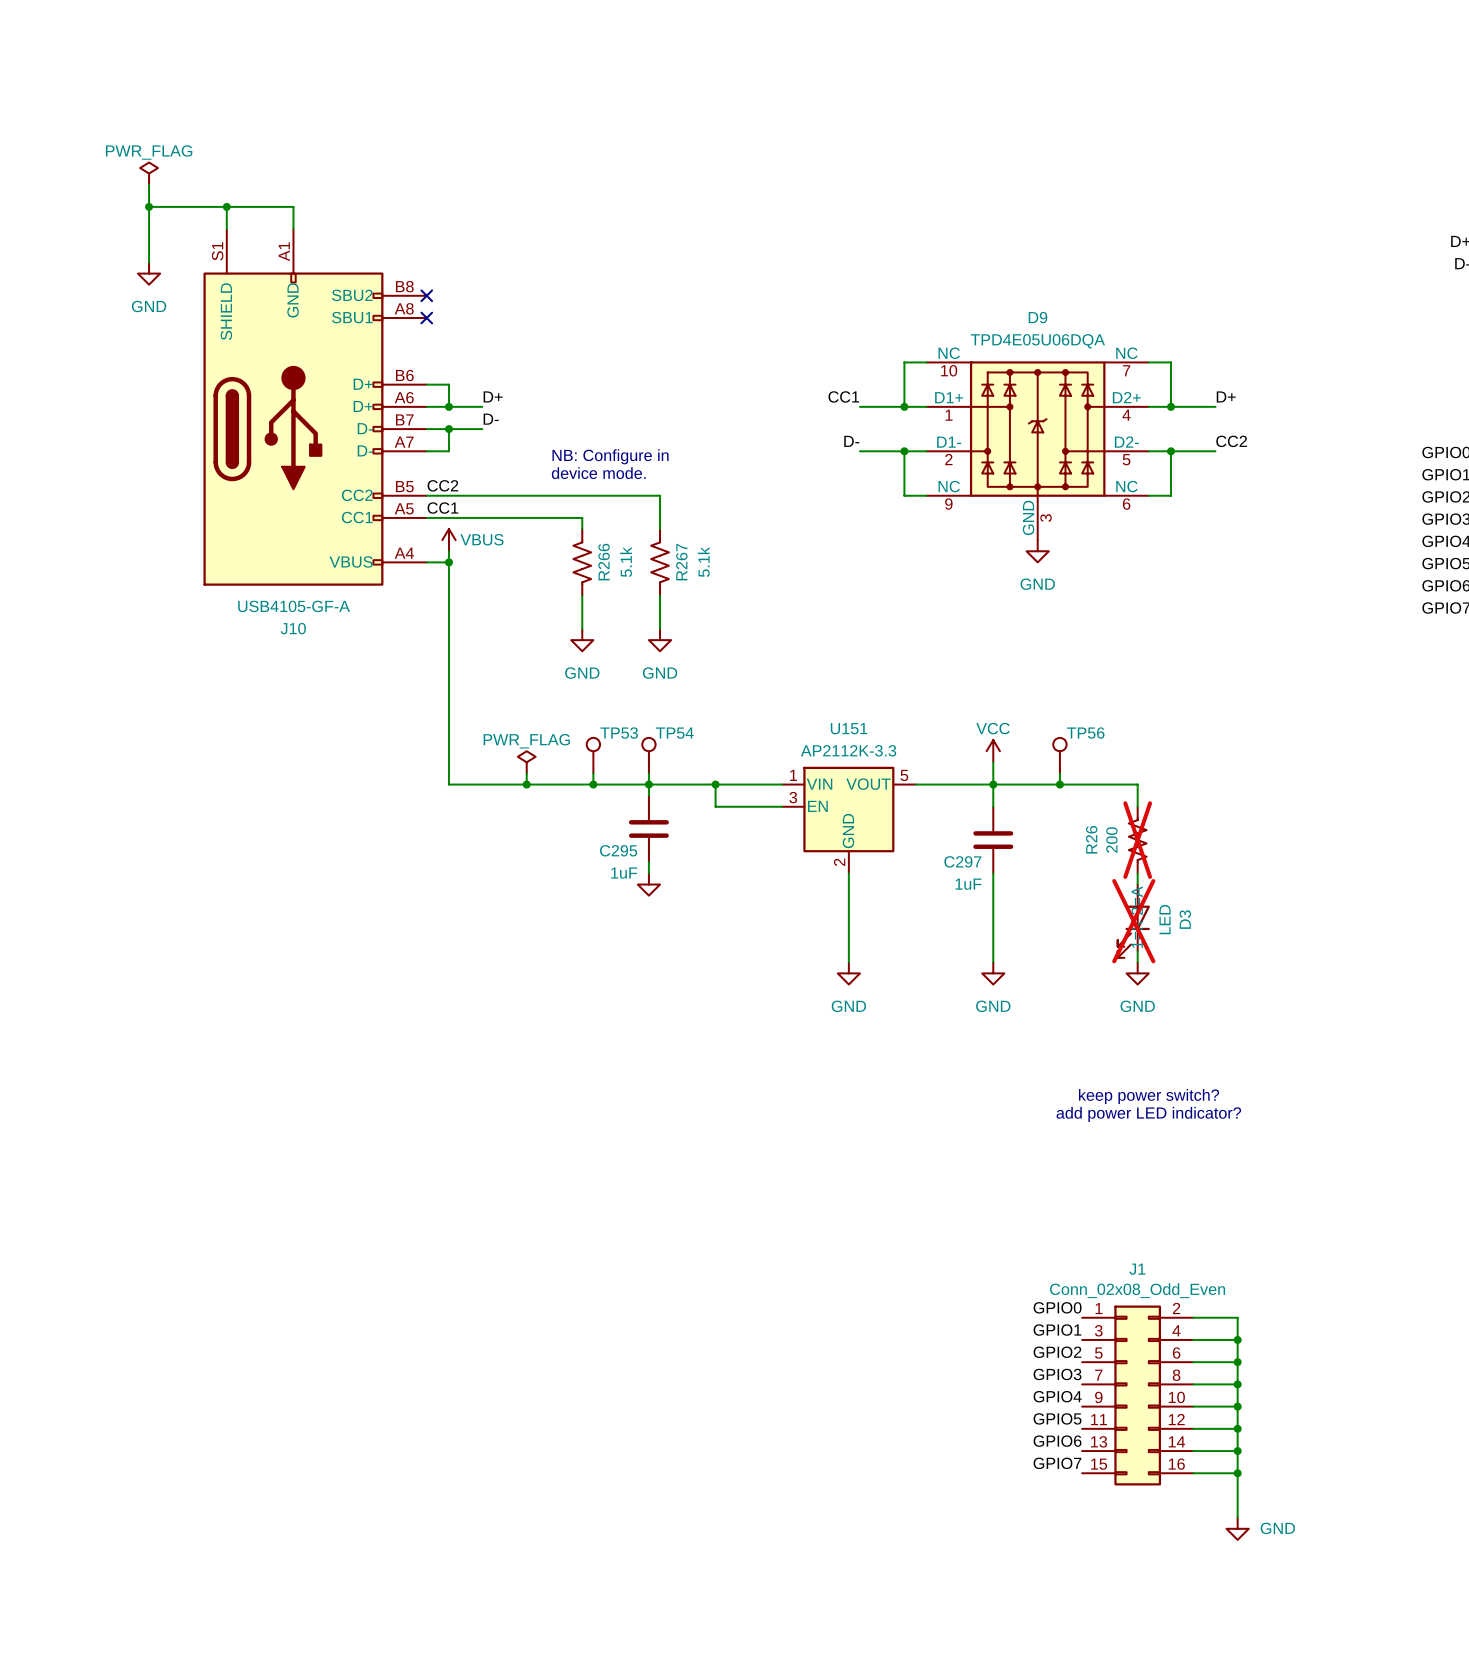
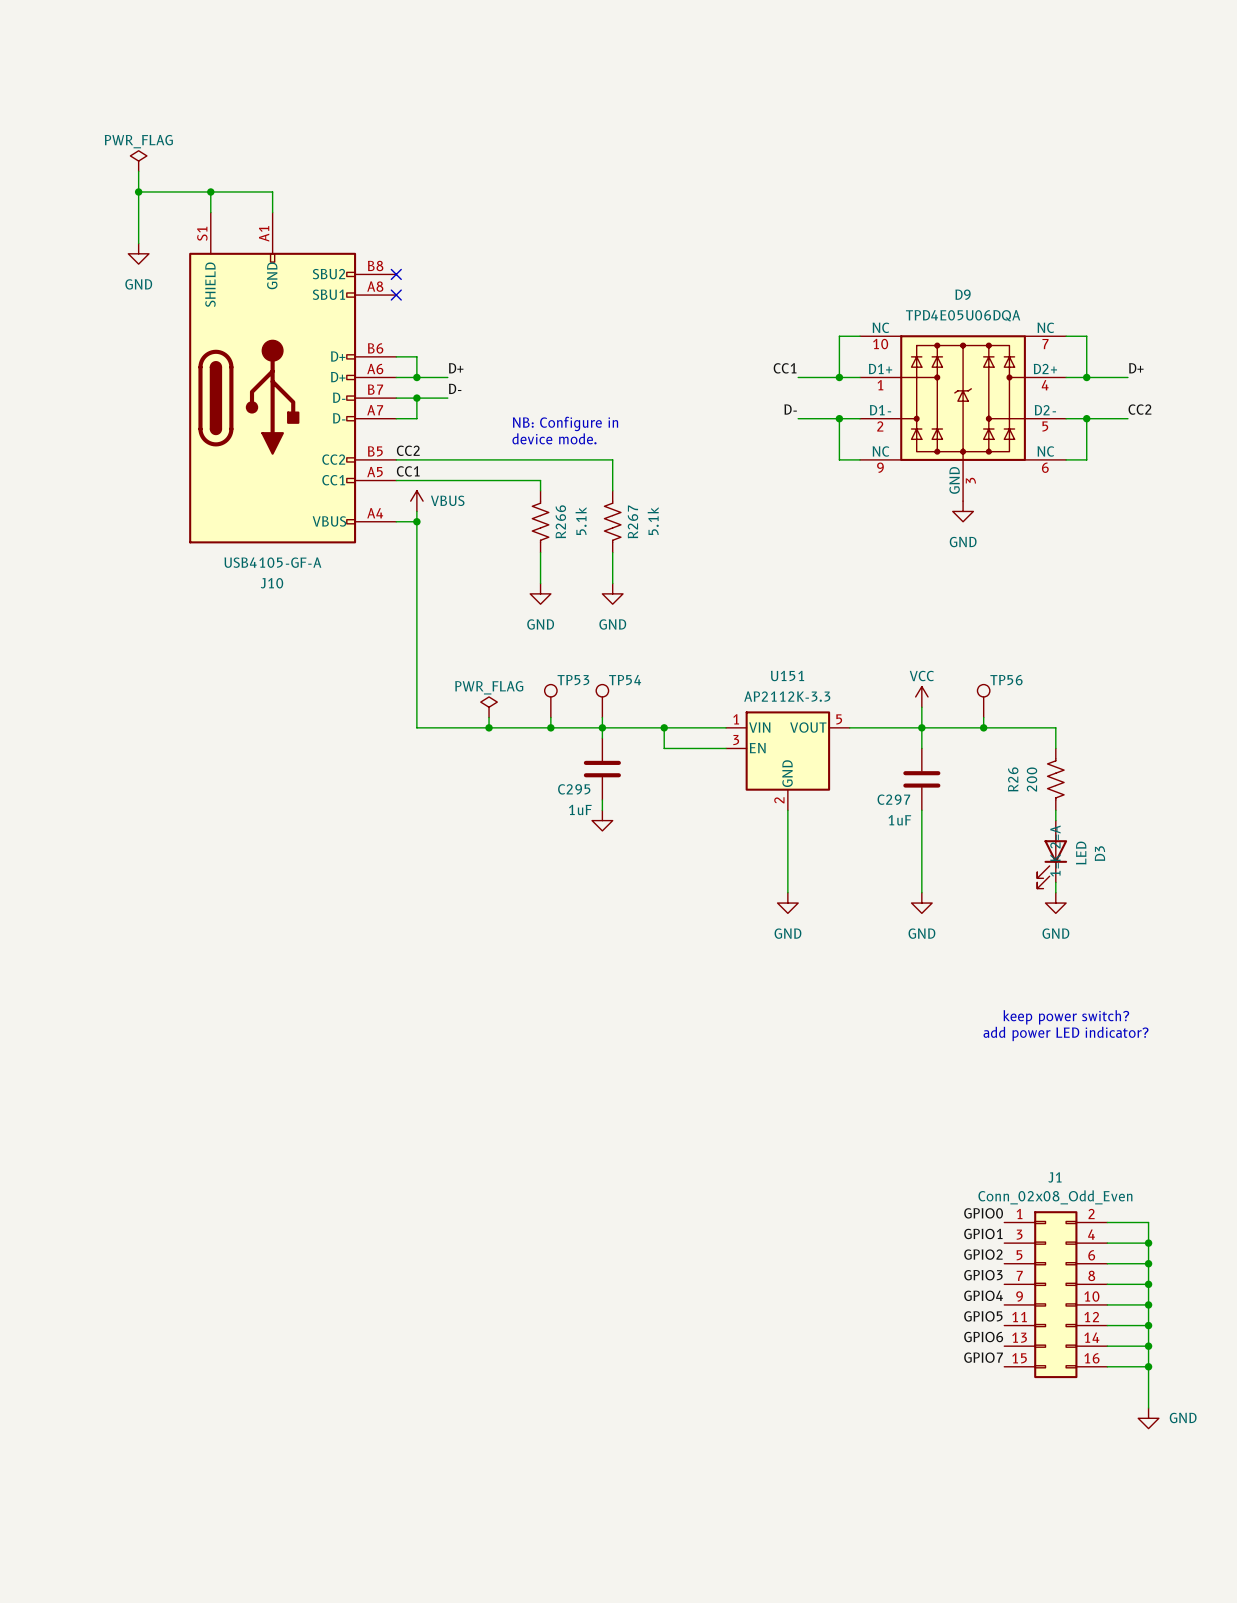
R26 do-not-place cross: (1137, 840) -> none
D3 do-not-place cross: (1133, 921) -> none

